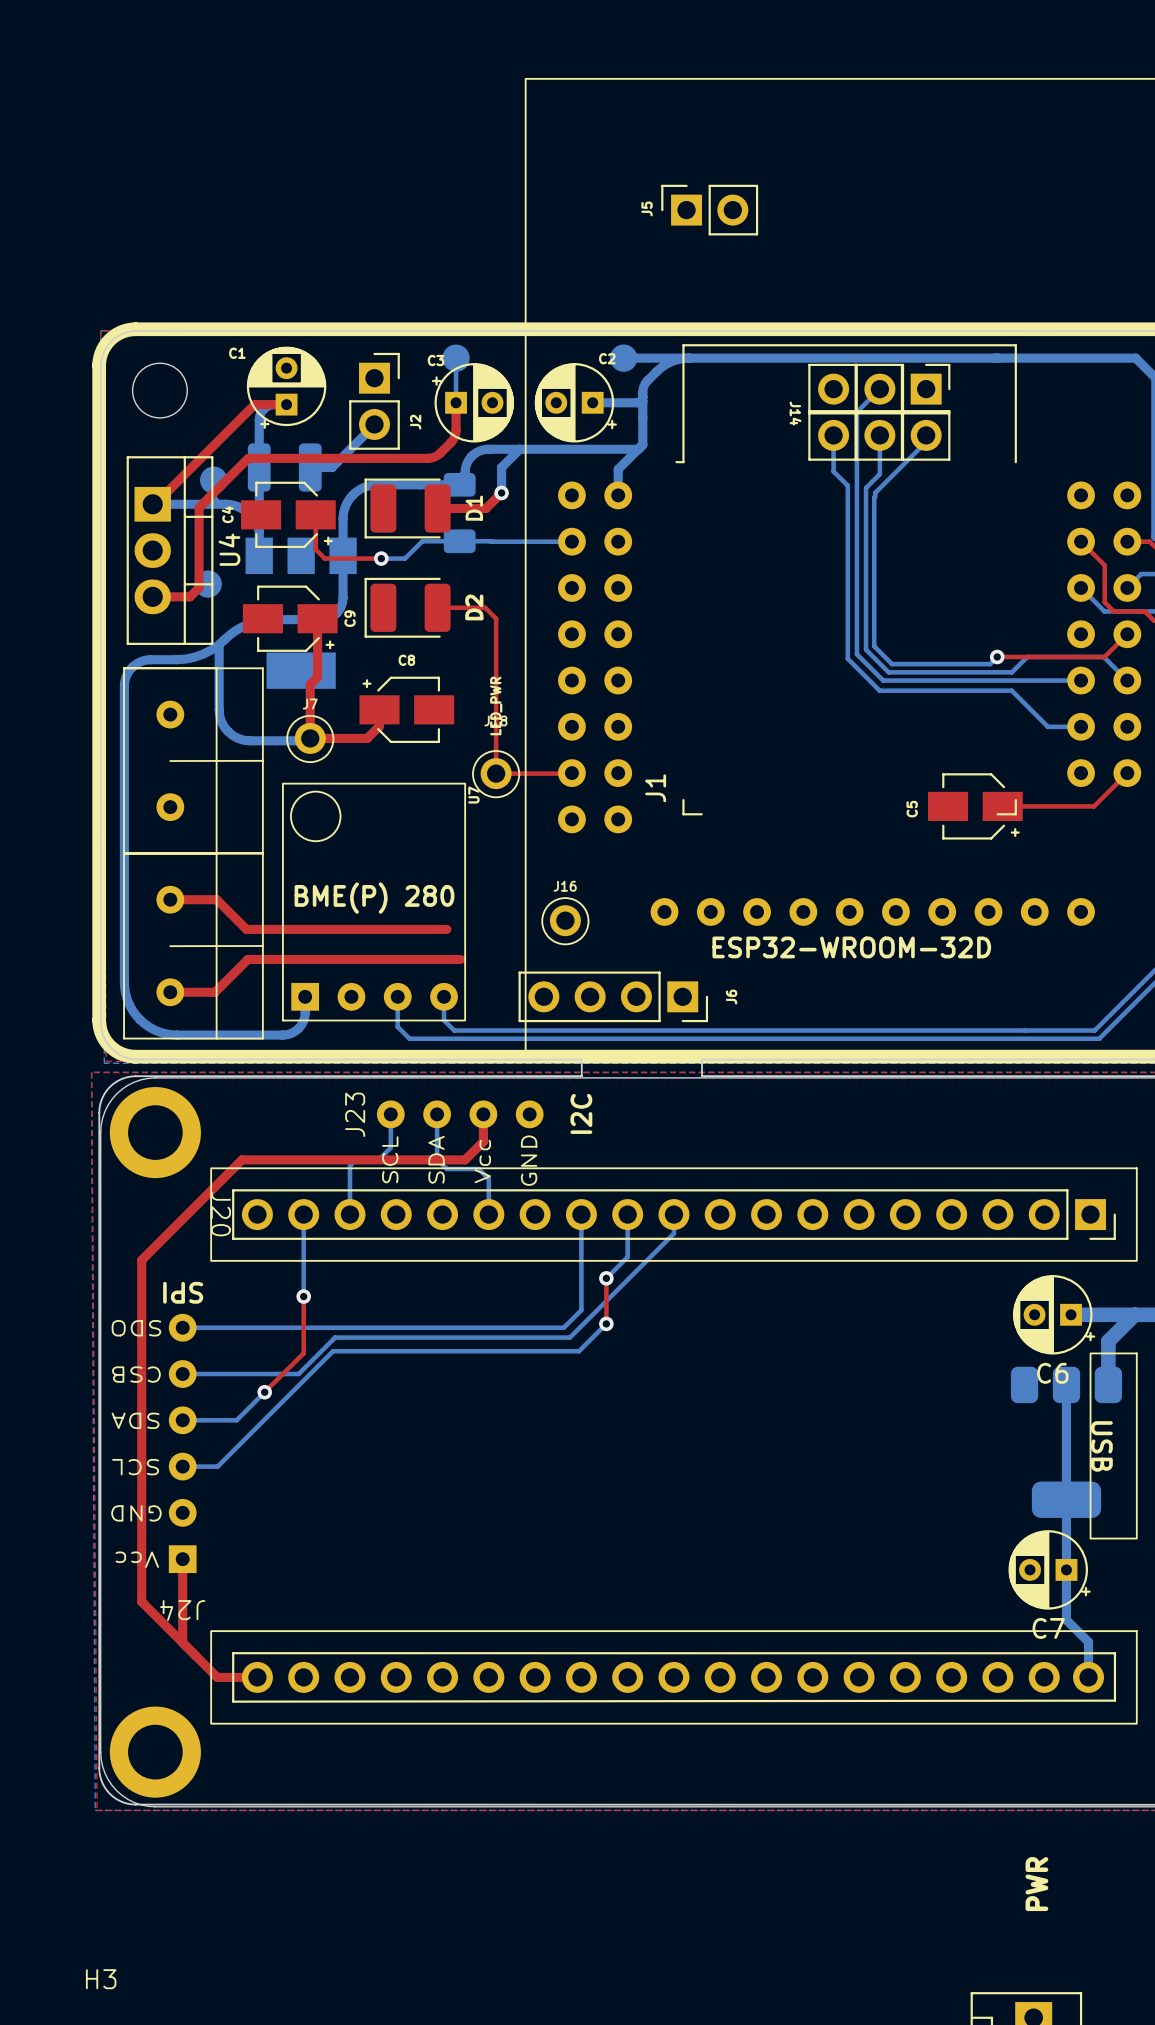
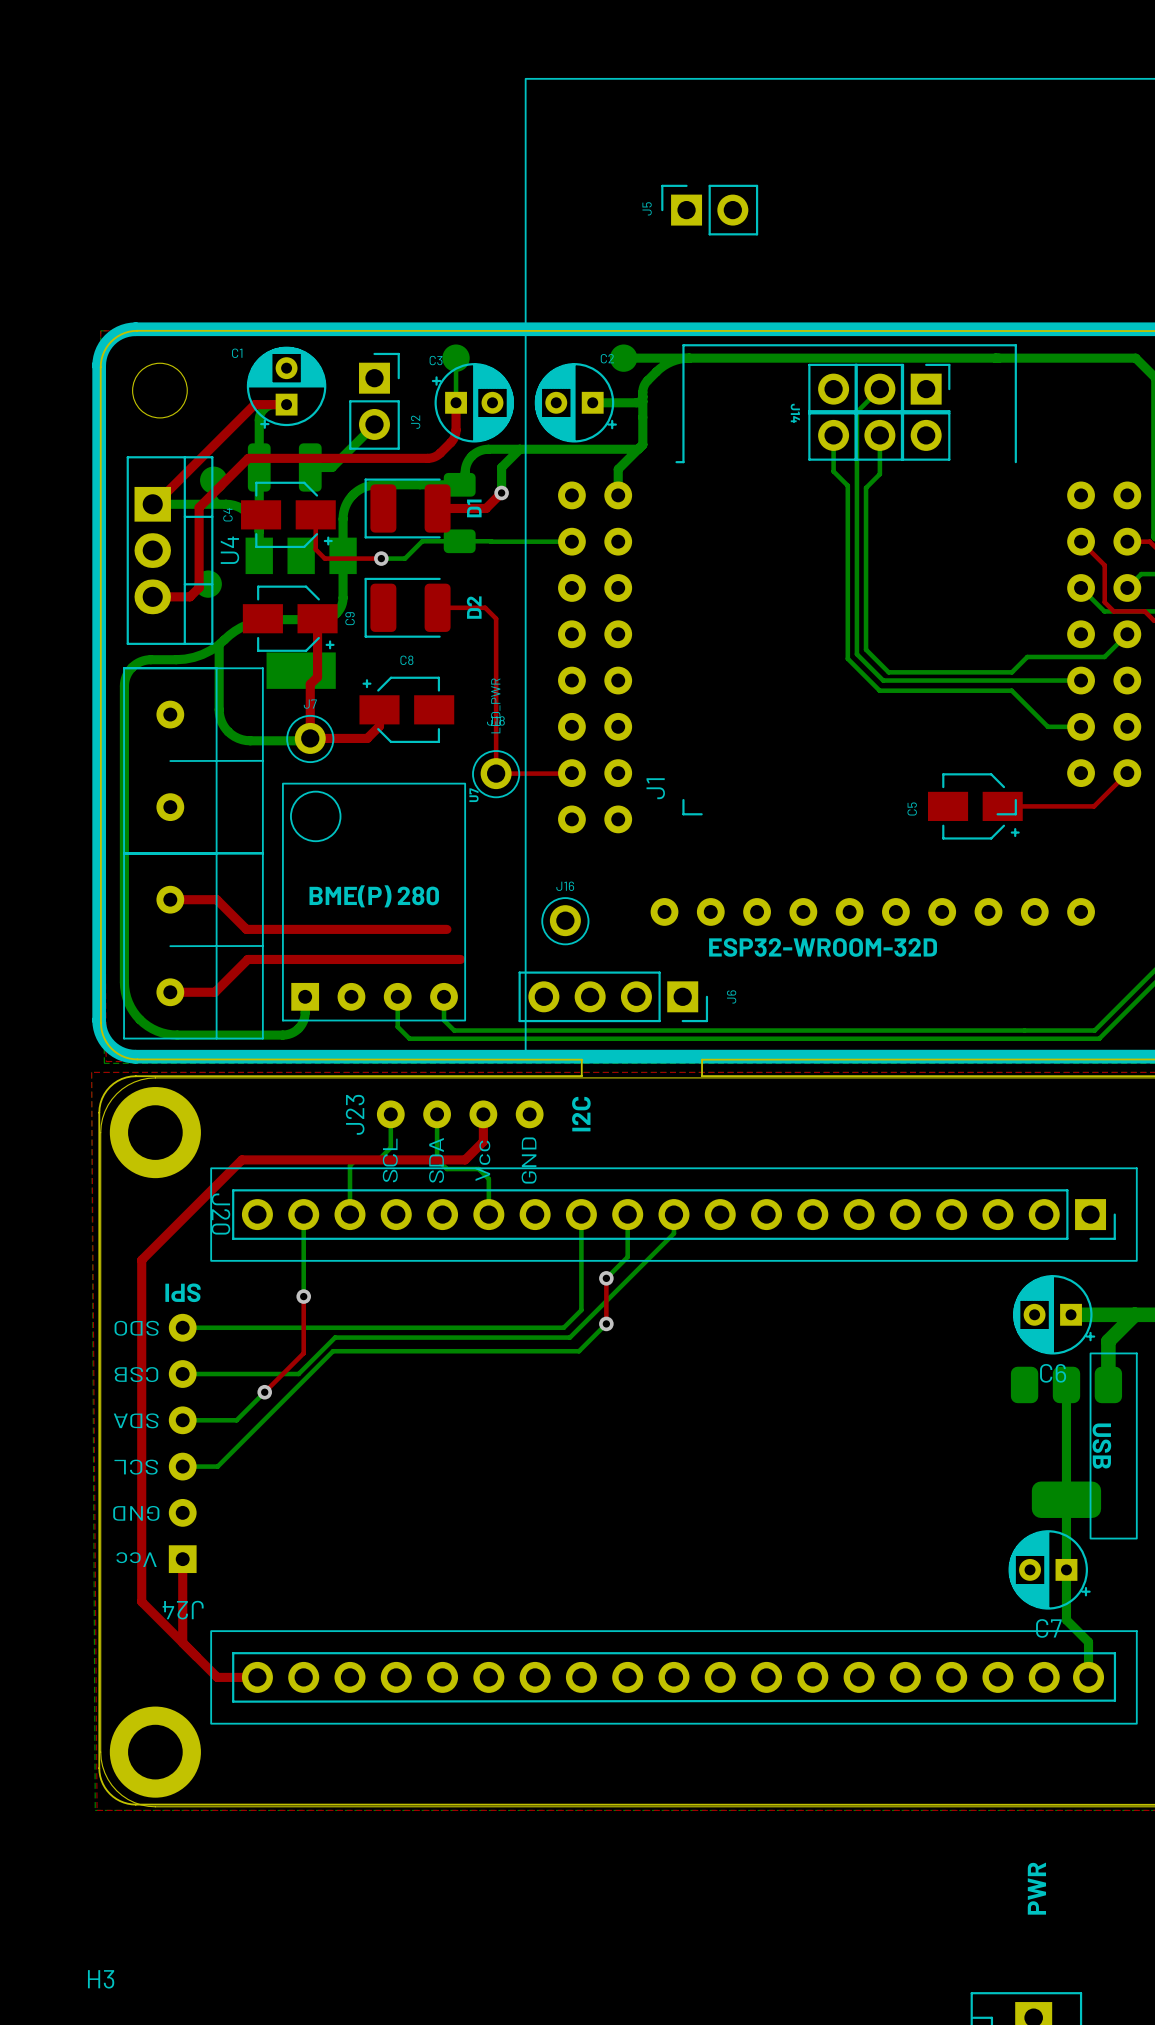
bottom track: (926, 435) (926, 441) (875, 492) (874, 646) (892, 664) (990, 664) (997, 656) -> none
top track: (1127, 634) (1104, 656) (997, 656) -> none
via: (997, 656) -> none
bottom track: (1103, 656) (1127, 680) -> (1103, 656) (1127, 634)

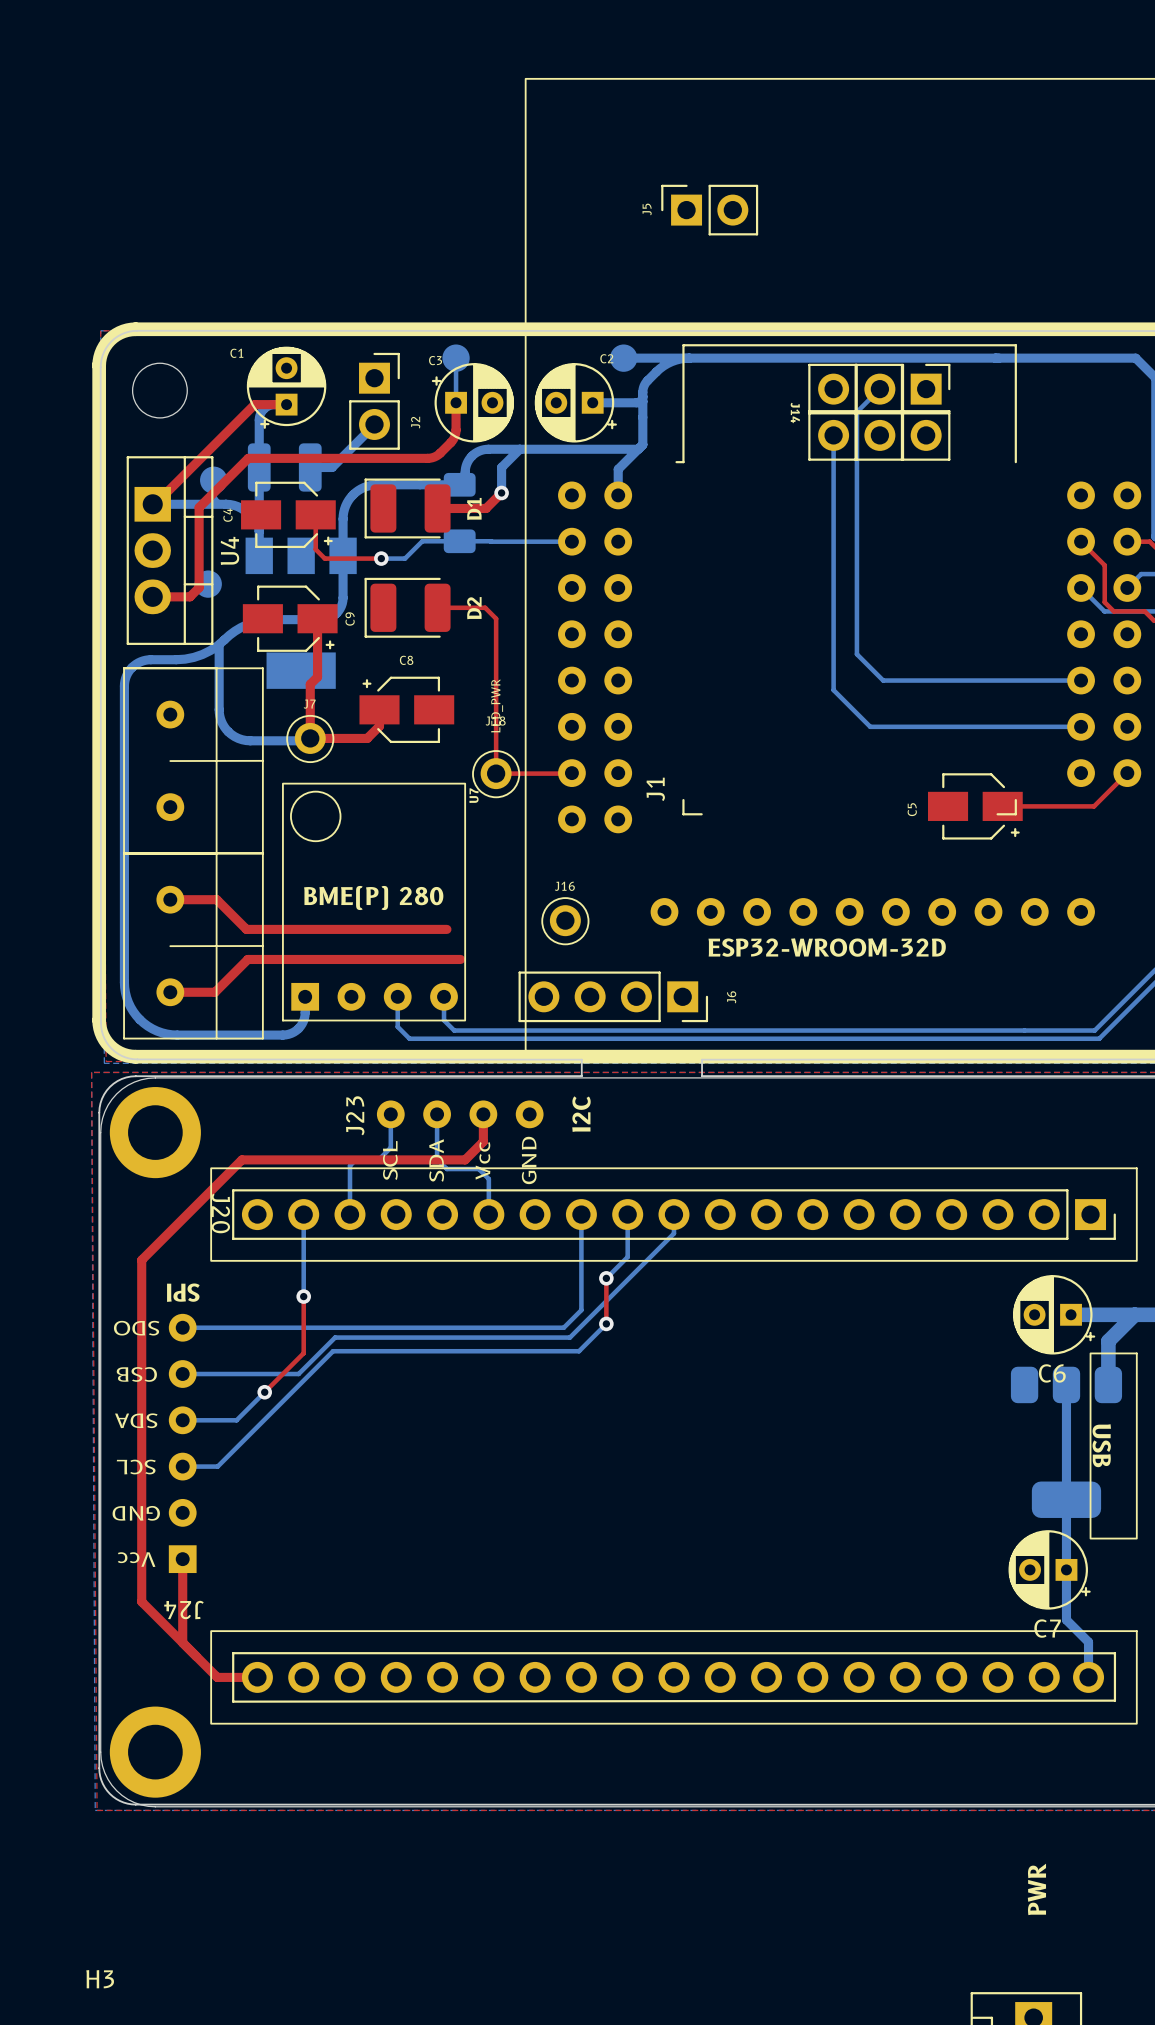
bottom track: (879, 435) (879, 474) (866, 487) (866, 649) (888, 672) (1011, 672) (1027, 656) (1104, 656) (1127, 634) -> none
bottom track: (833, 471) (847, 485) (847, 658) (879, 690) (1011, 690) (1047, 726) -> (833, 471) (833, 690) (870, 726) (1047, 726)

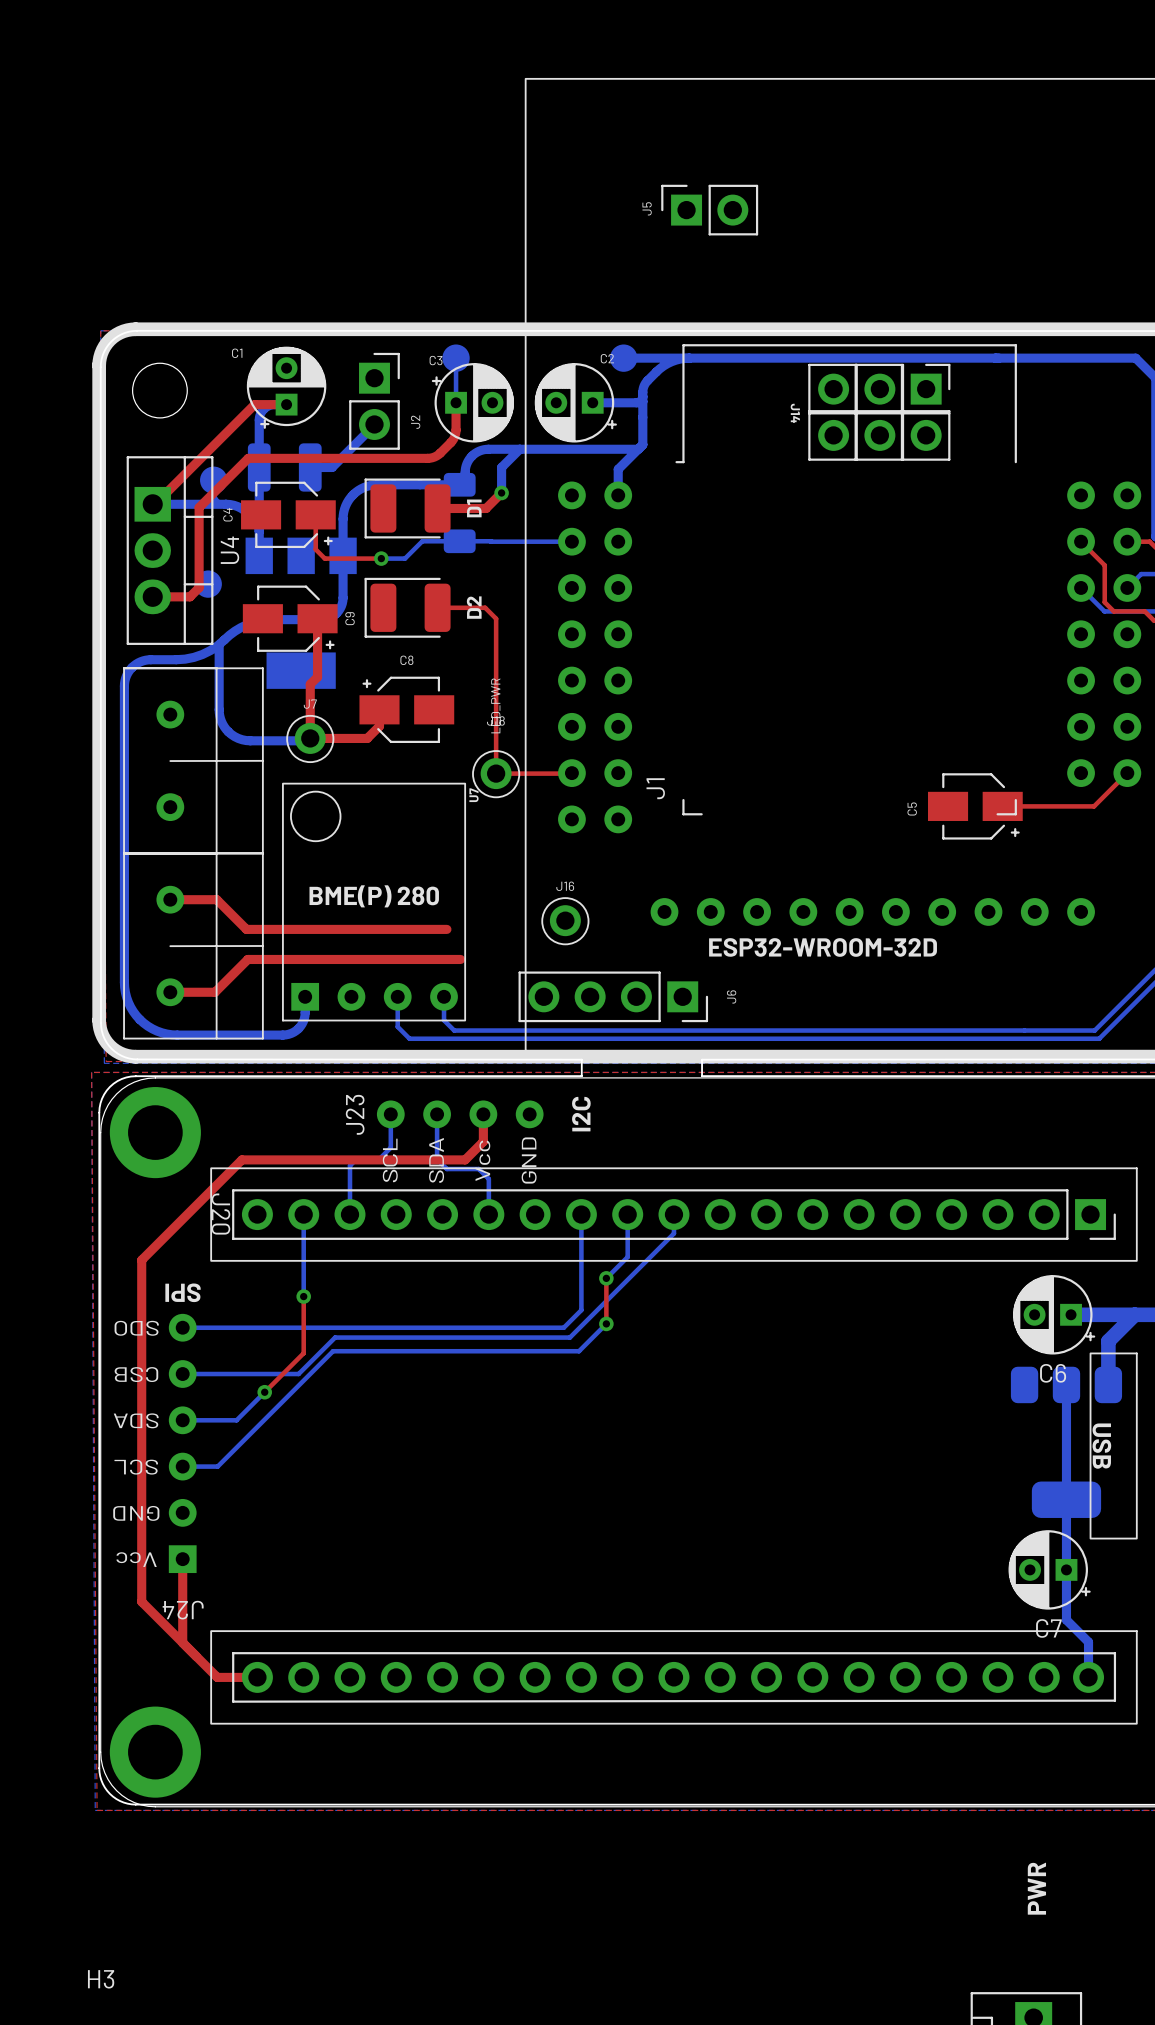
bottom track: (879, 389) (856, 412) (856, 654) (883, 680) (1081, 680) -> none
bottom track: (833, 435) (833, 690) (870, 726) (1081, 726) -> none

